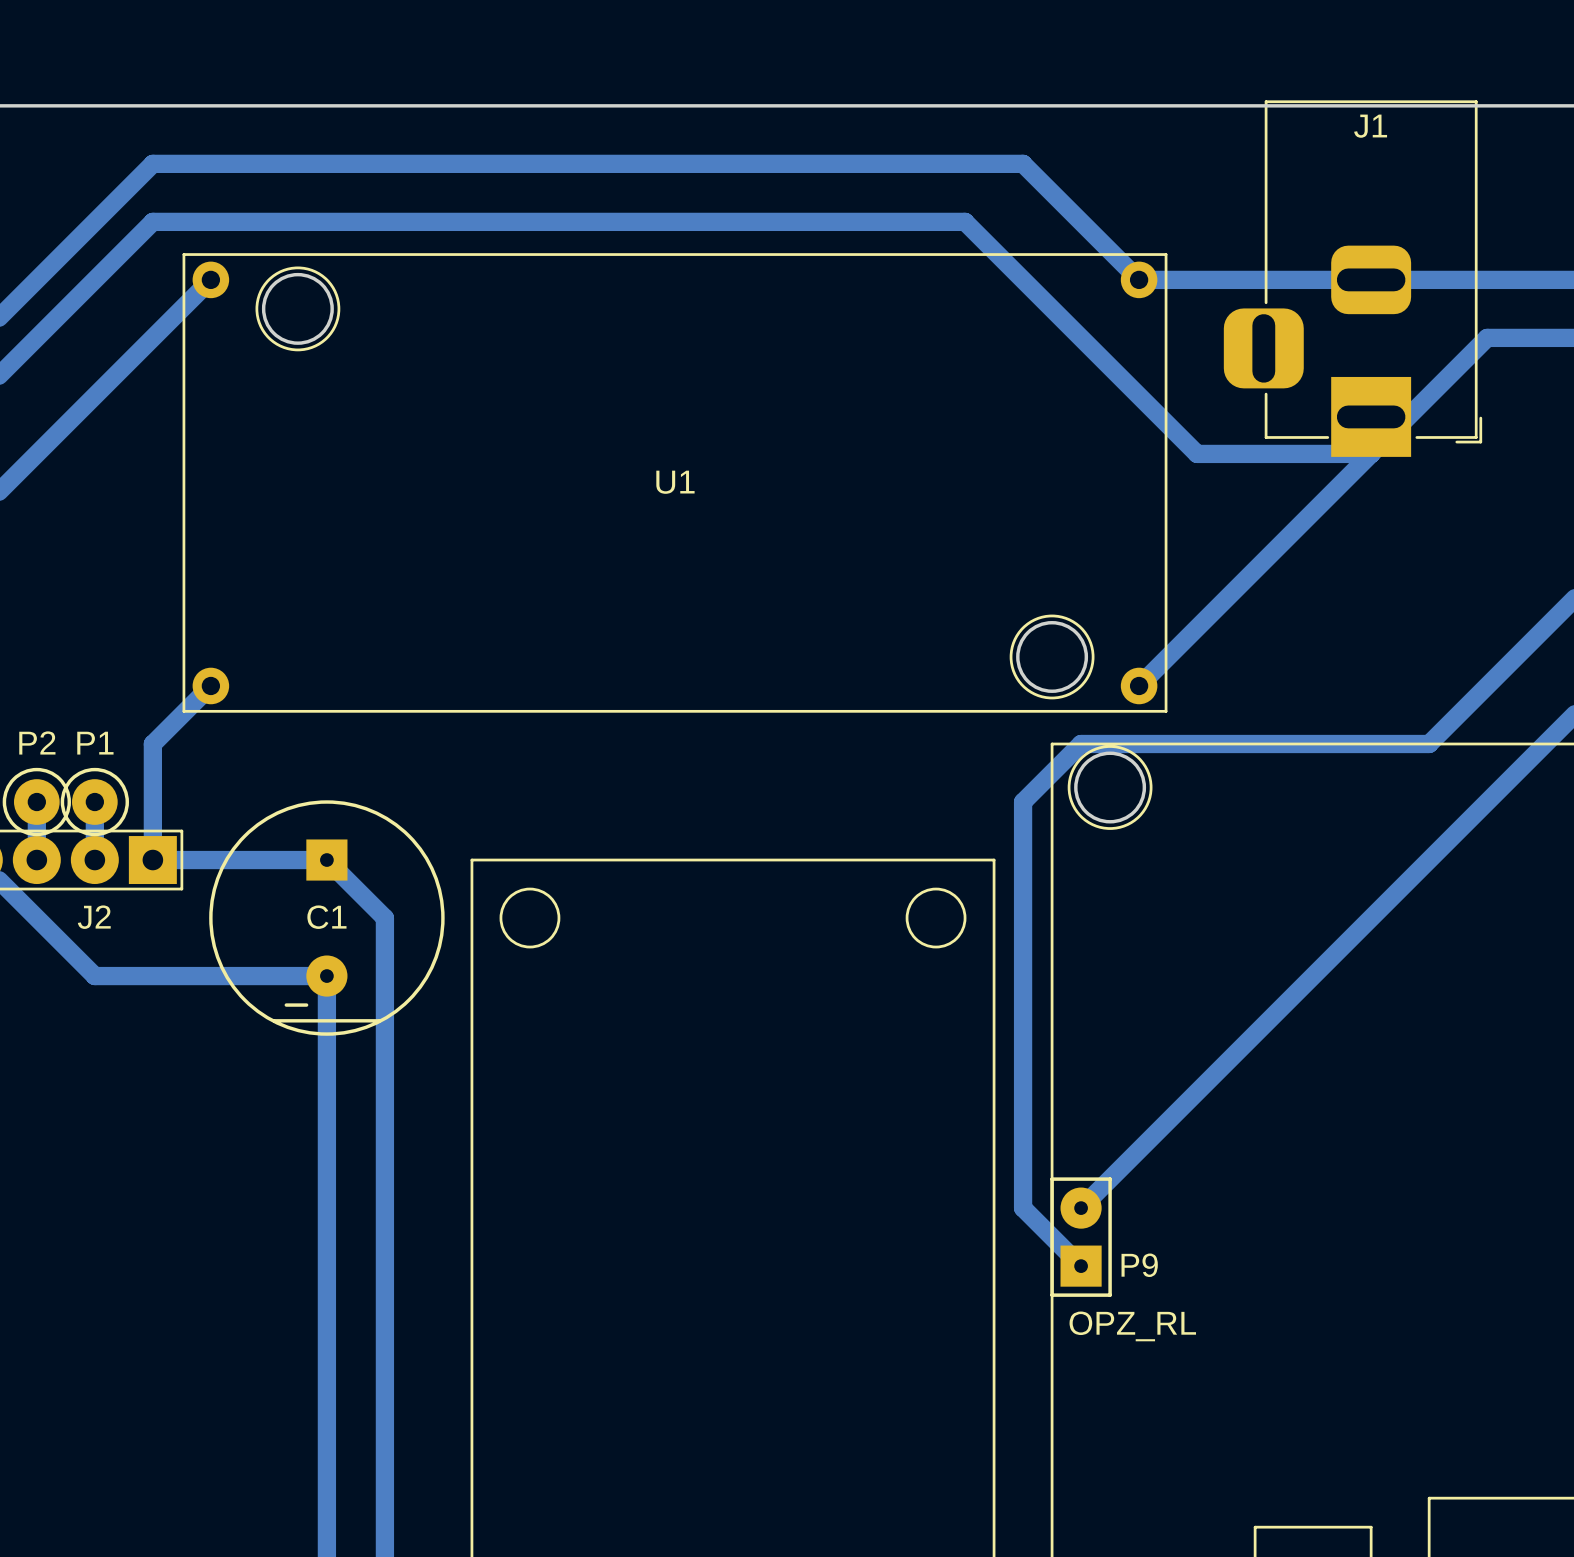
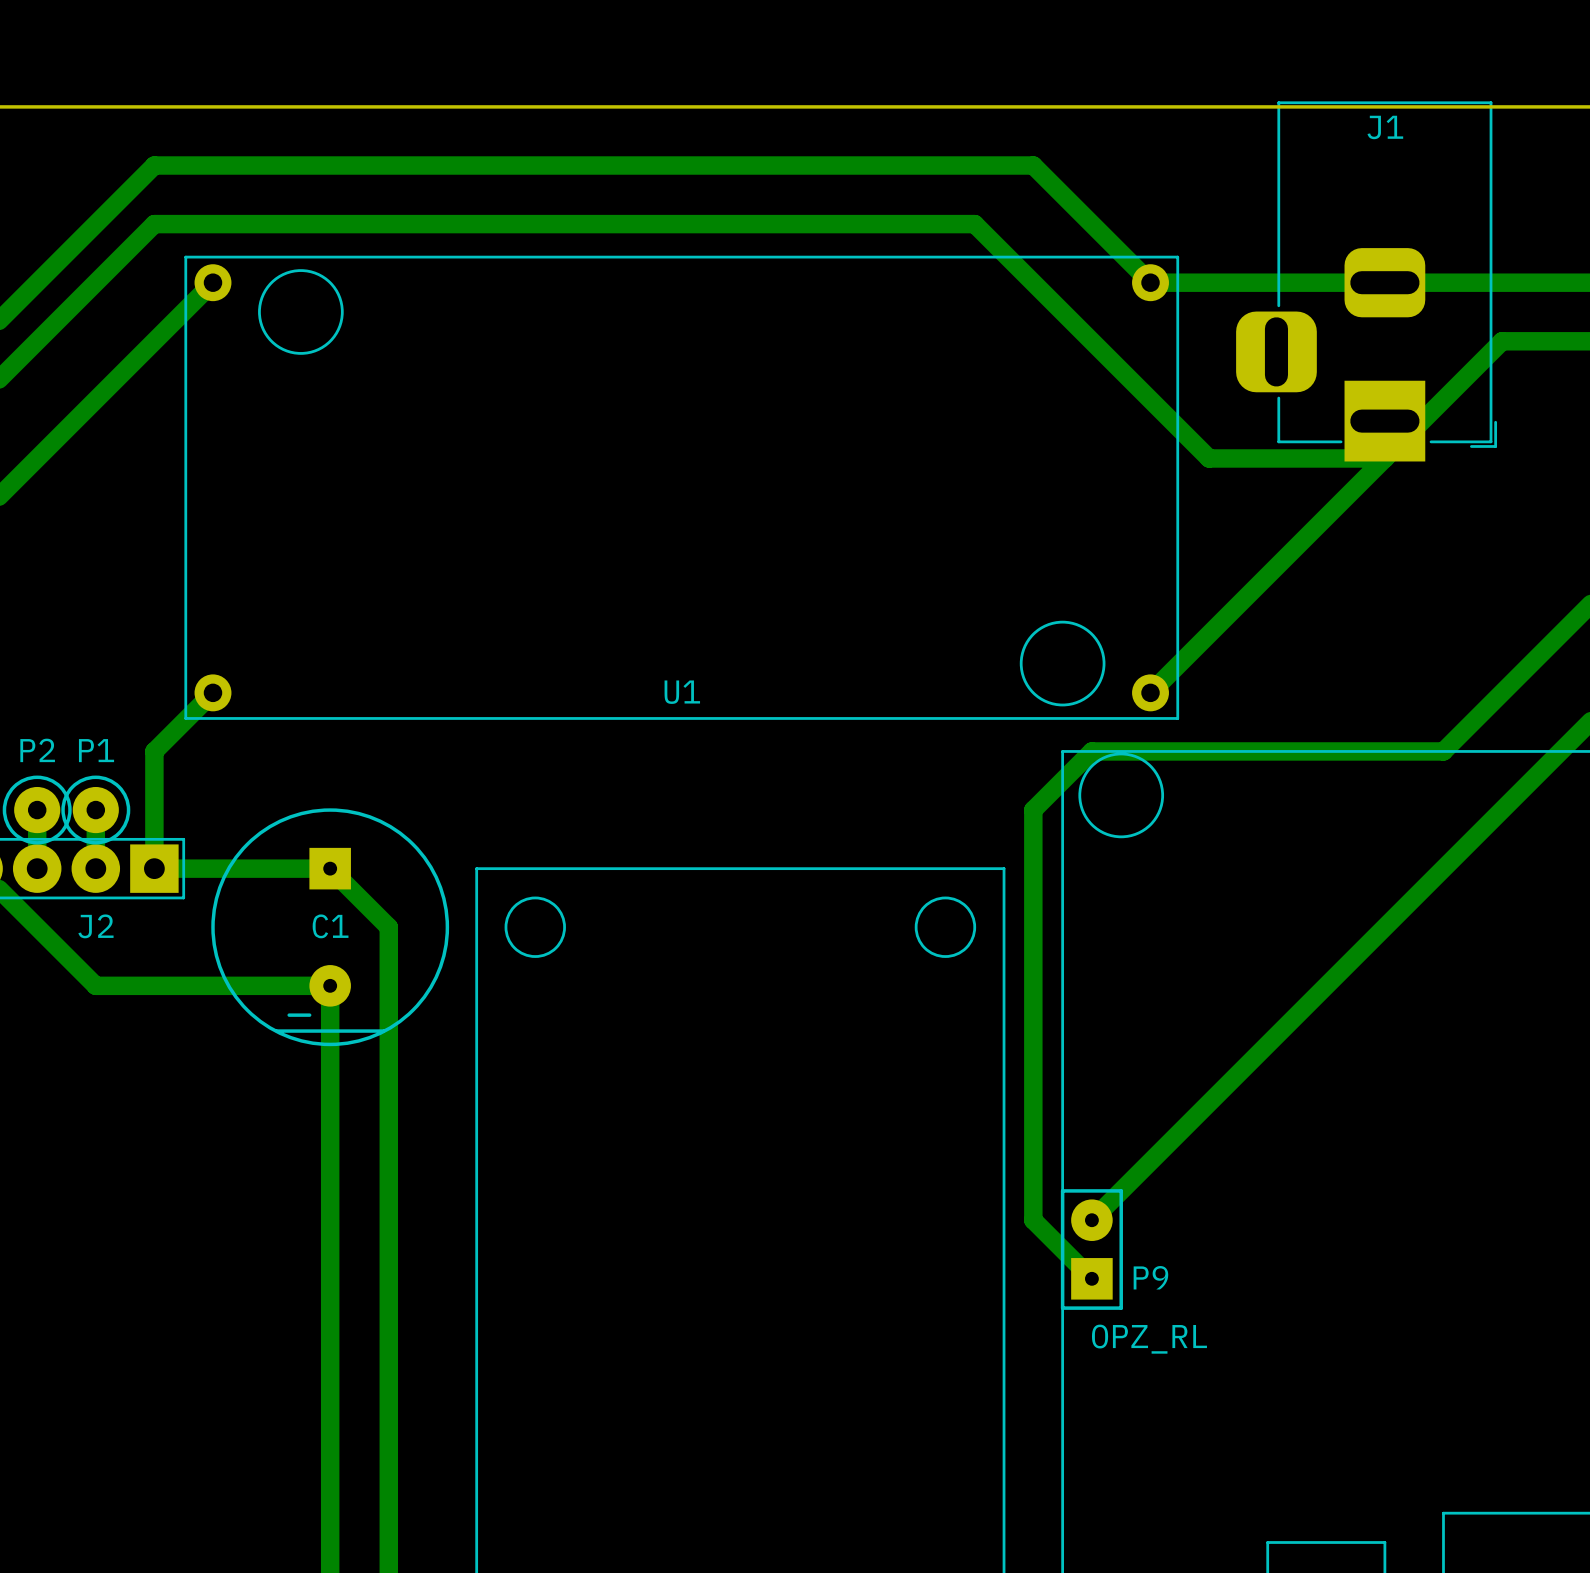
round board edge: [261, 272, 334, 345] -> none
U1 name position: U1 (675, 482) -> U1 (682, 692)
round board edge: [1016, 621, 1089, 693] -> none
round board edge: [1074, 751, 1147, 824] -> none

